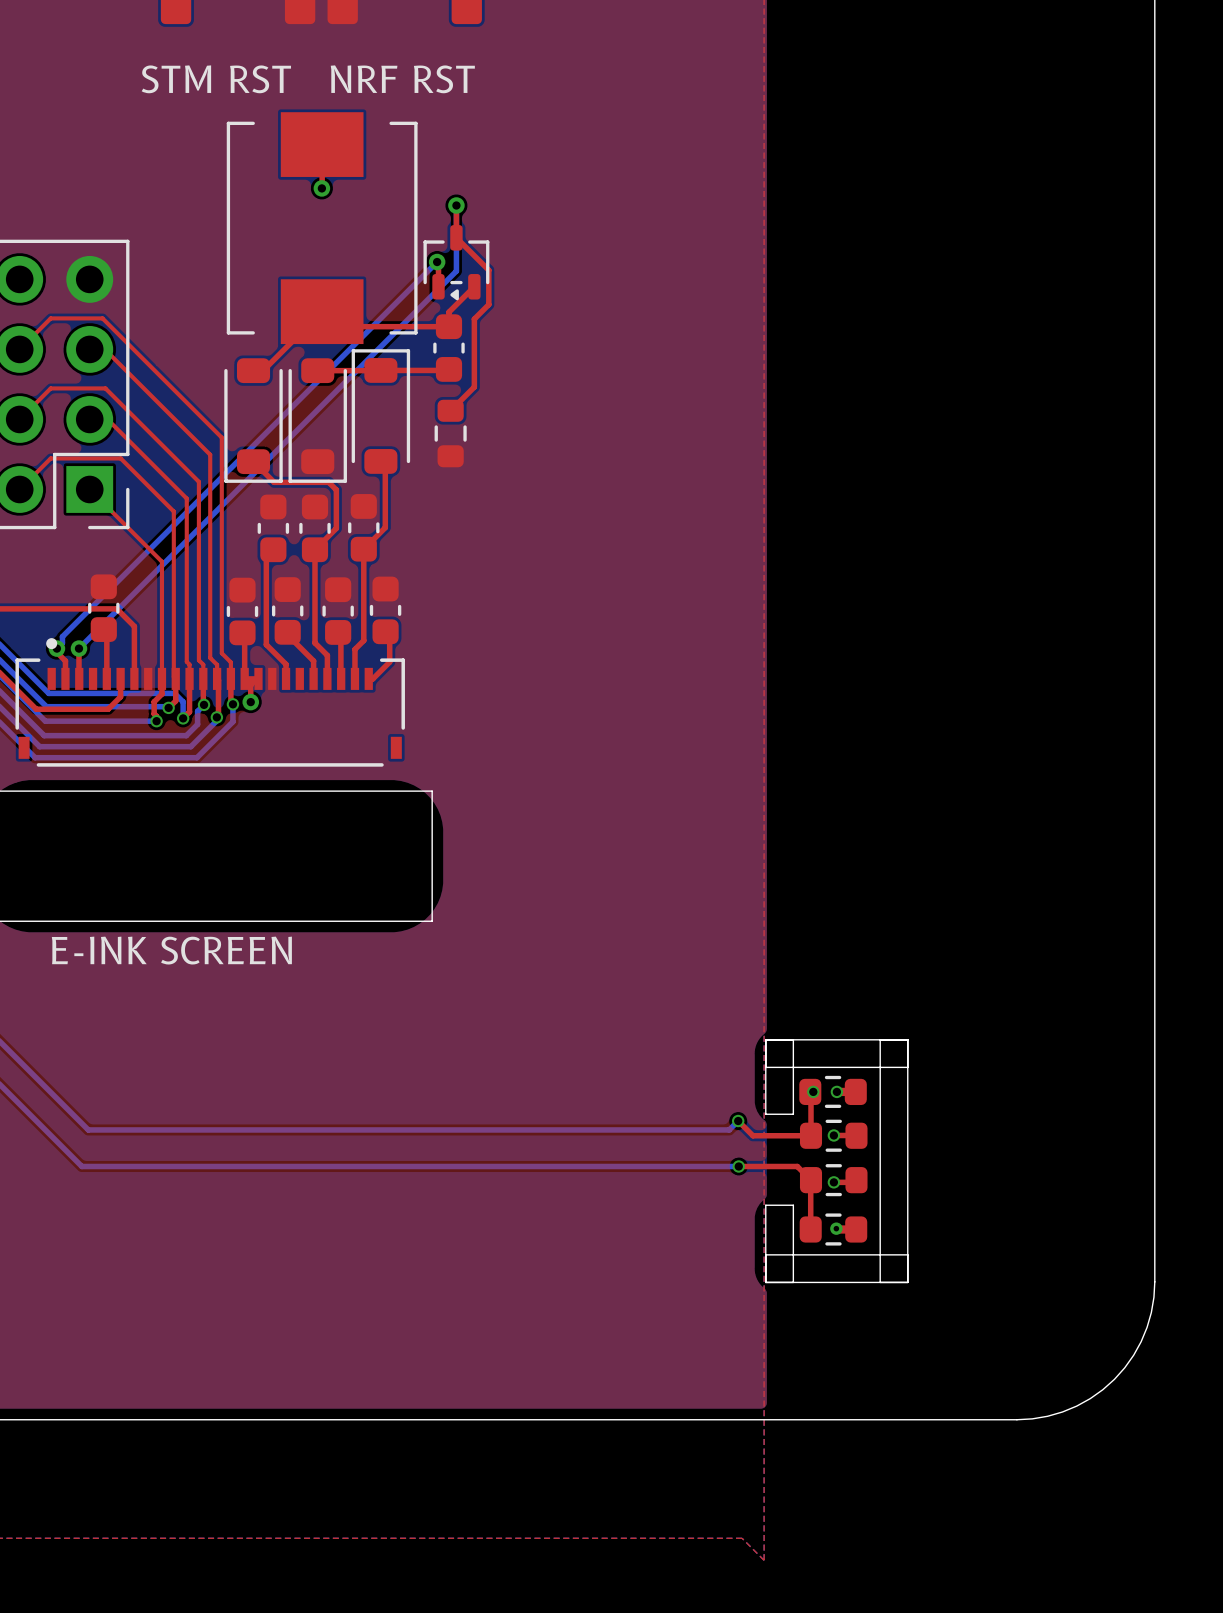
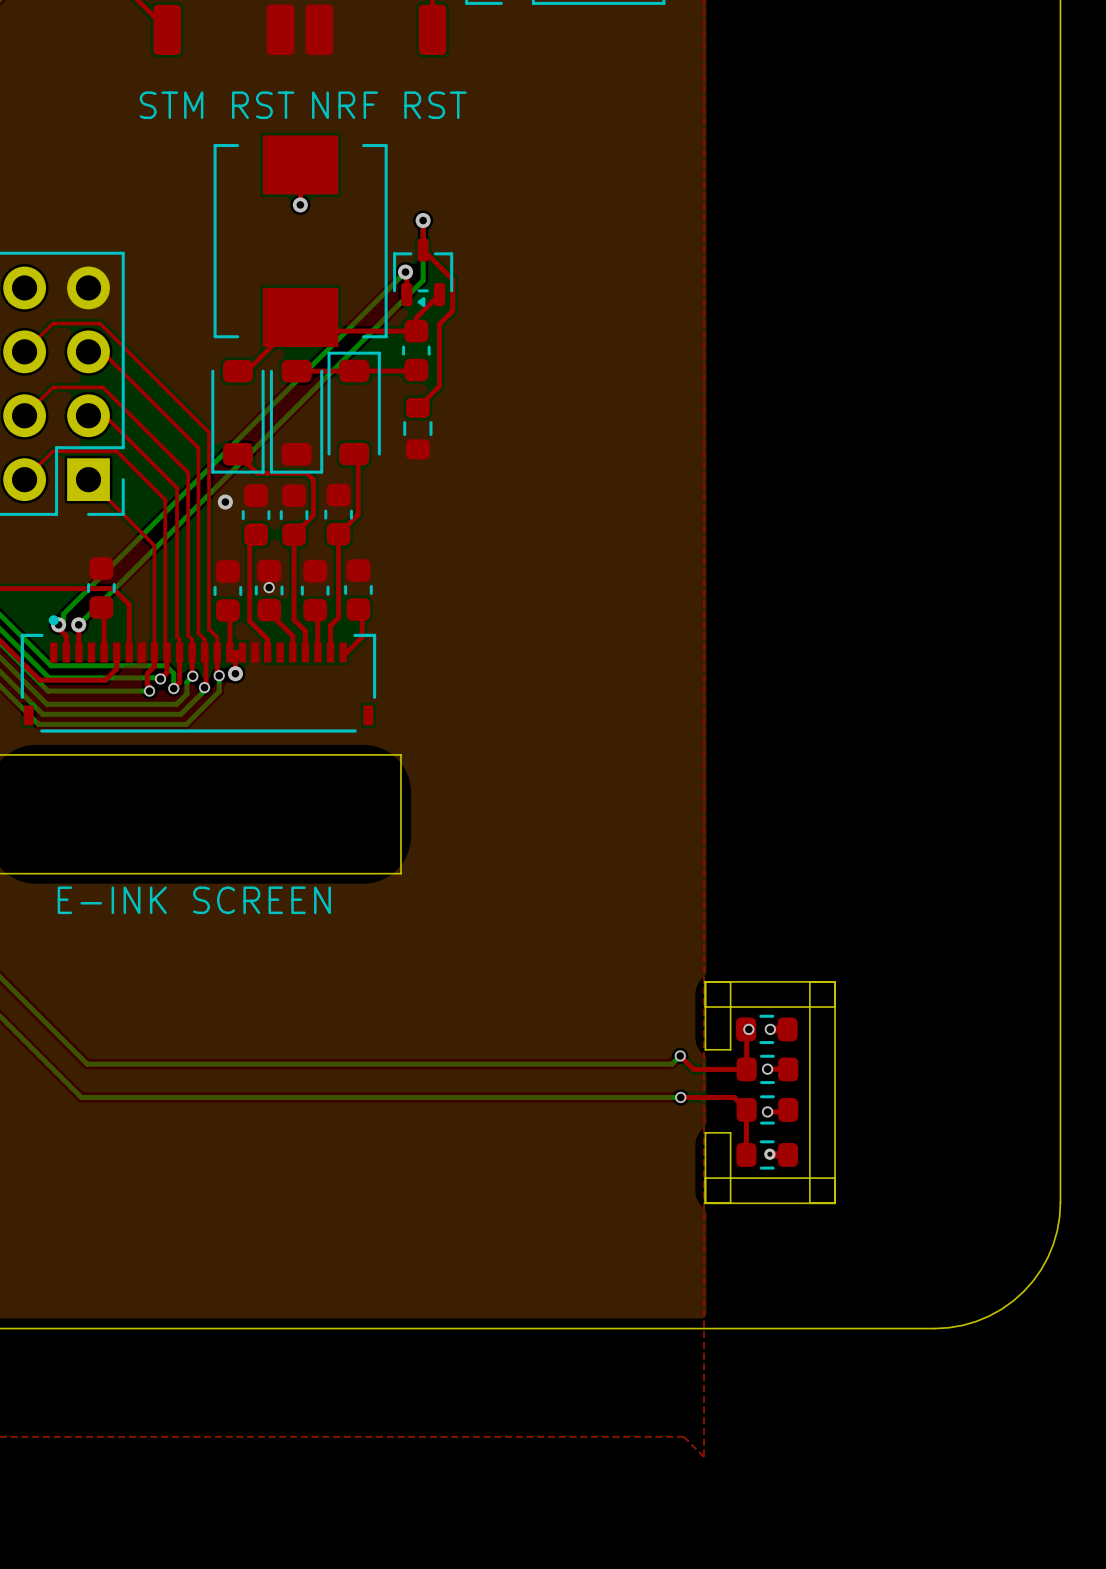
via: none -> (225, 502)
via: none -> (269, 587)

